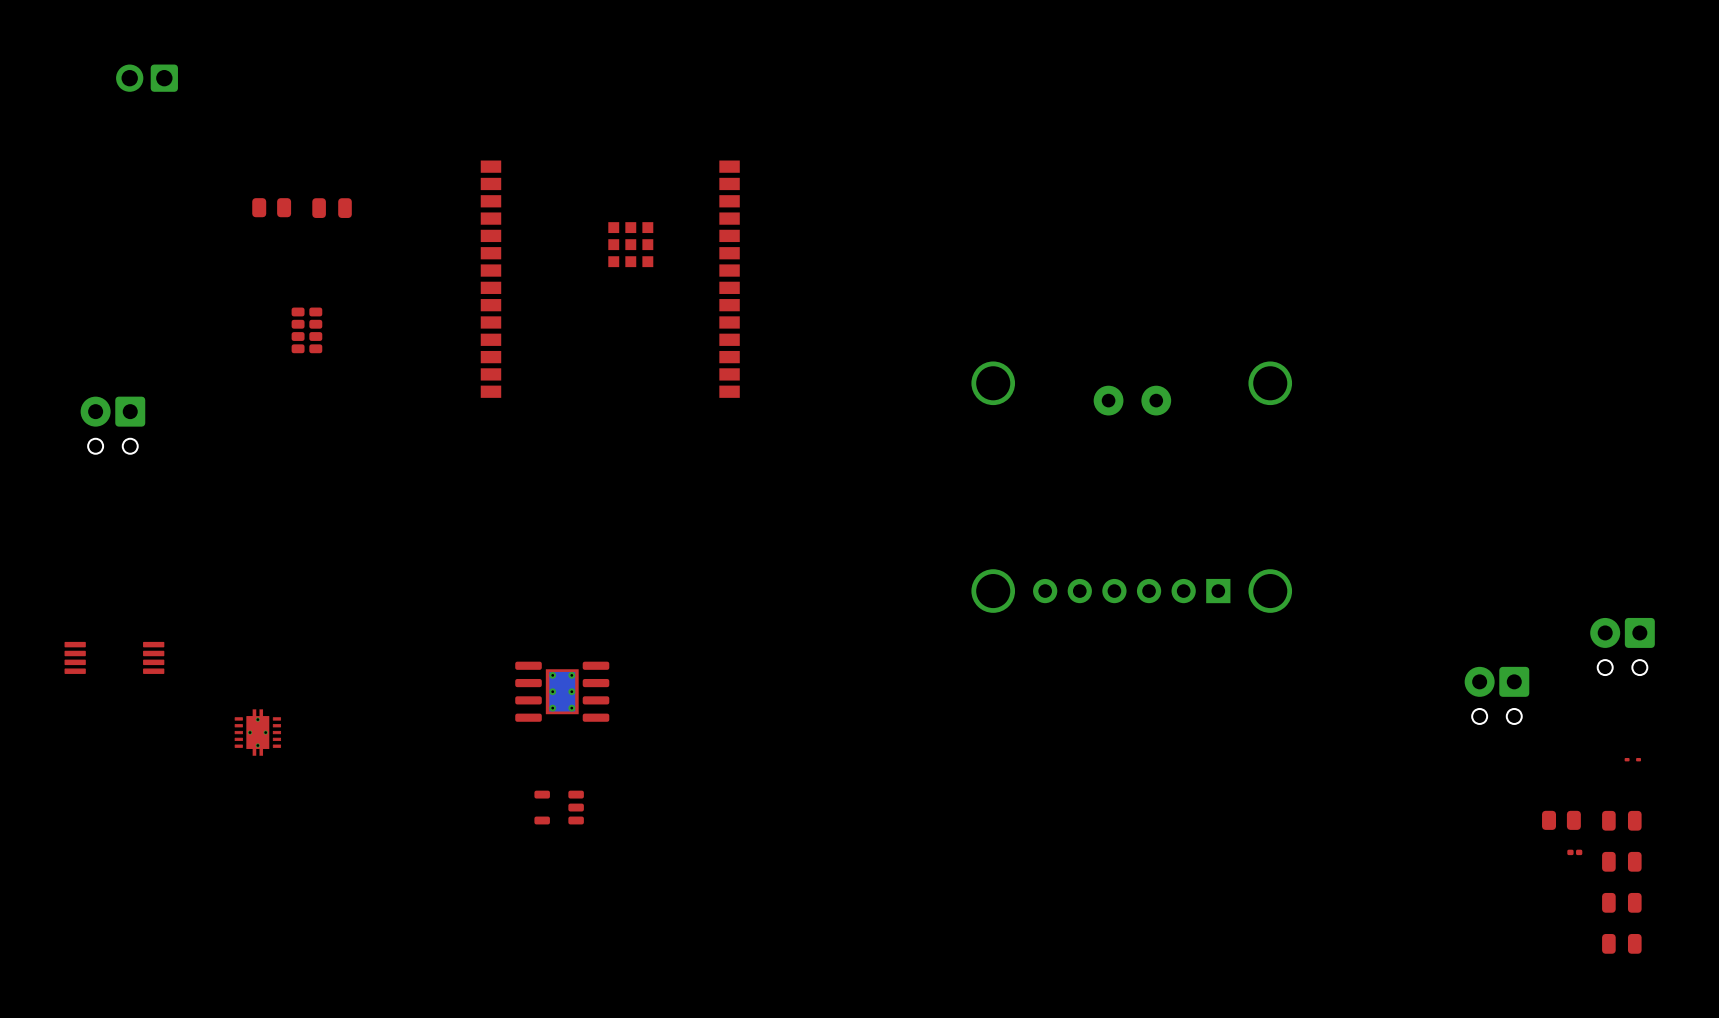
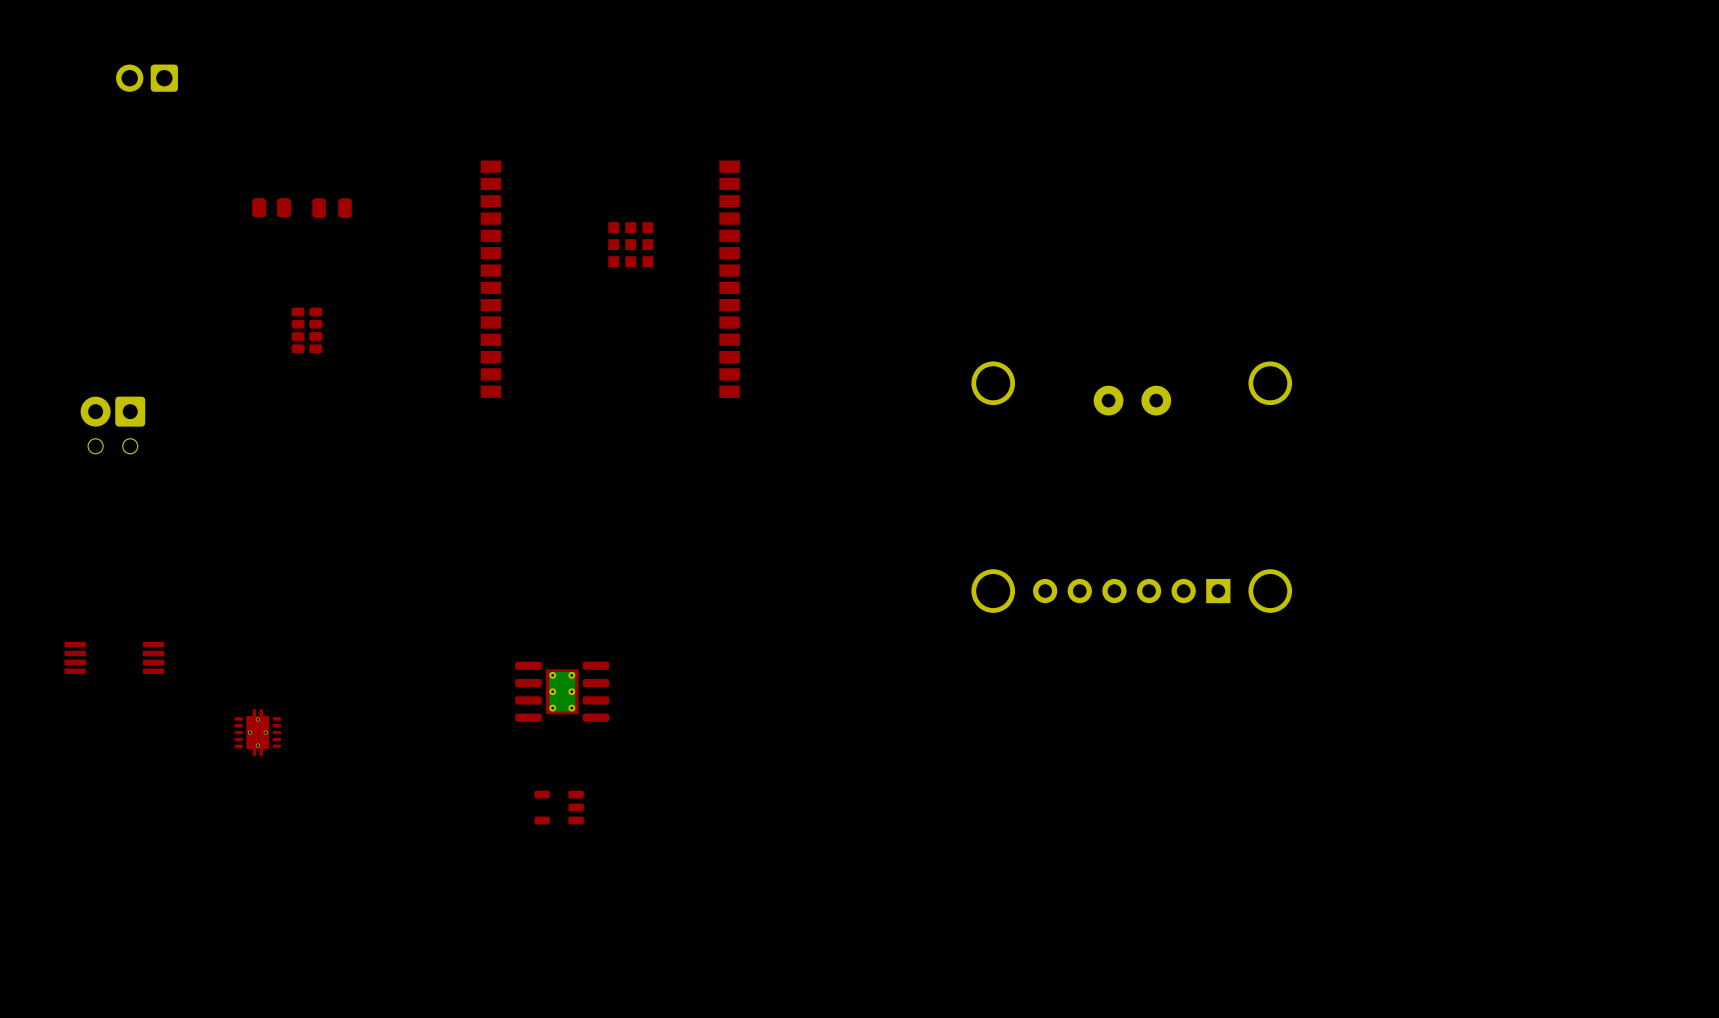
part: (1622, 646) -> none
part: (1496, 695) -> none
part: (1632, 759) -> none
part: (1561, 820) -> none
part: (1621, 820) -> none
part: (1574, 852) -> none
part: (1621, 861) -> none
part: (1621, 902) -> none
part: (1621, 943) -> none

